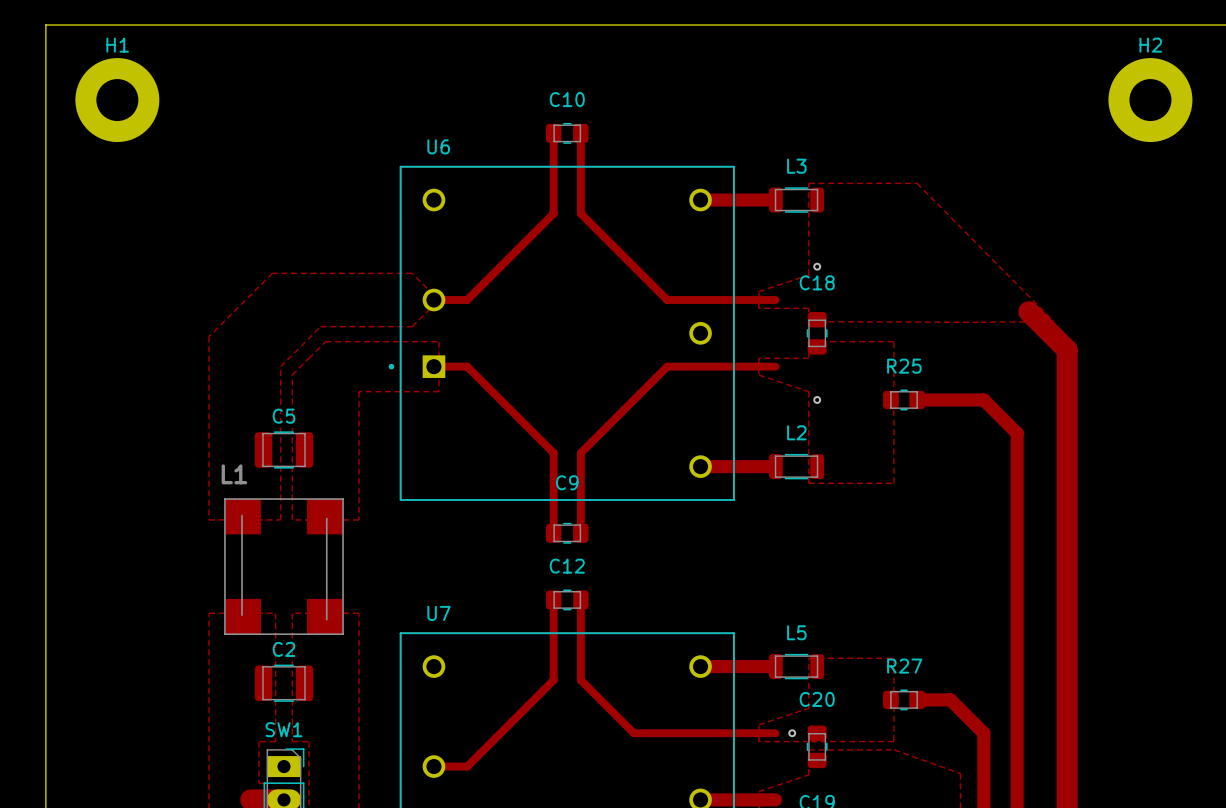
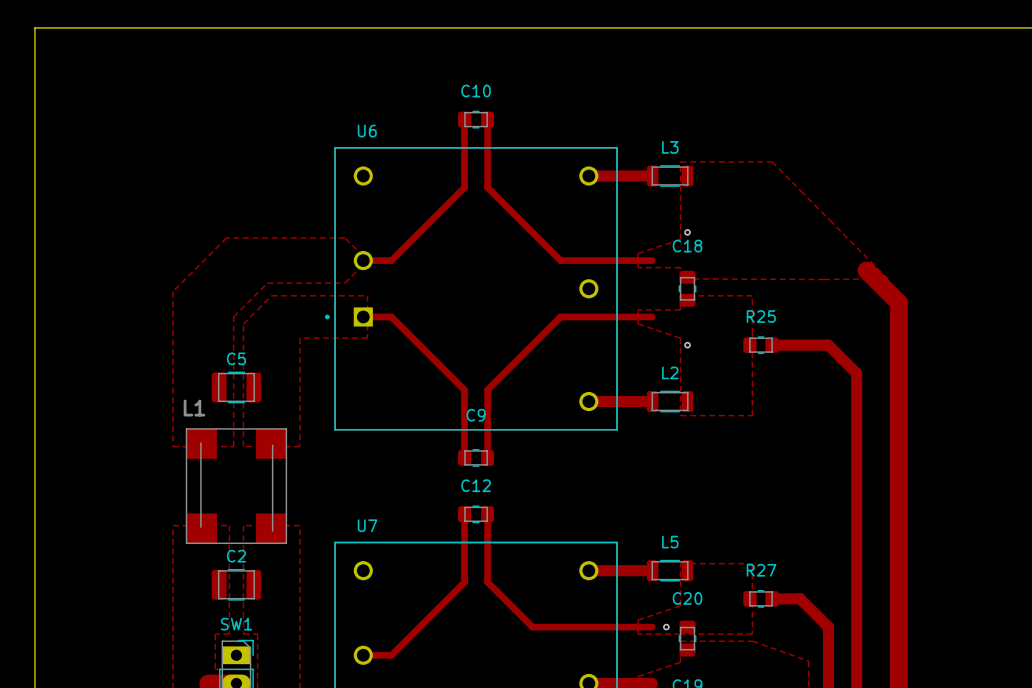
H1: (117, 100) -> none
H2: (1150, 100) -> none

